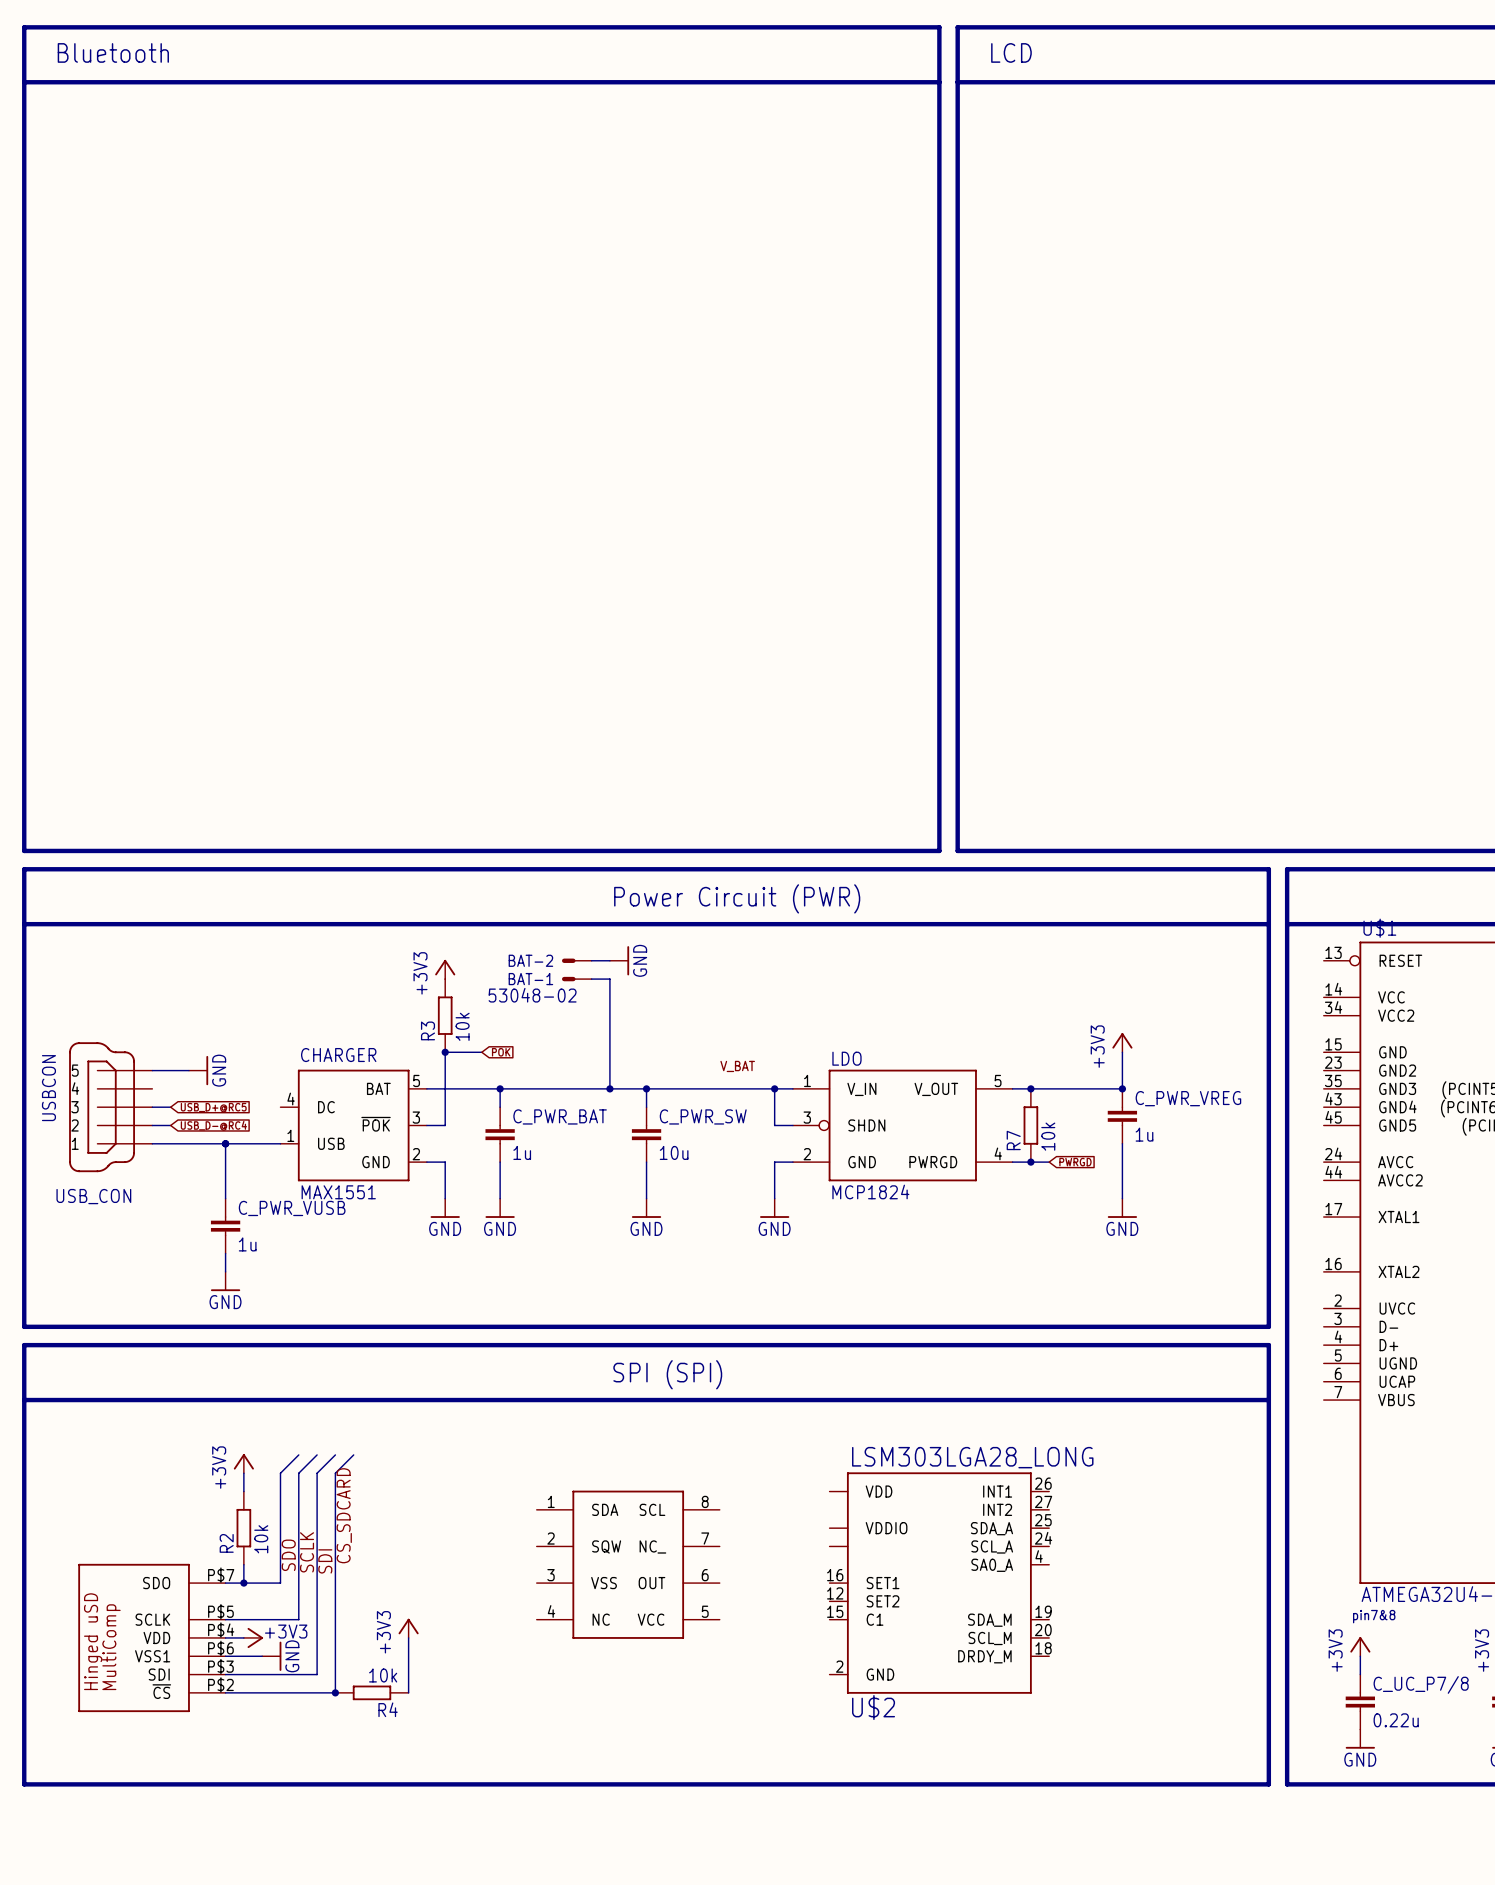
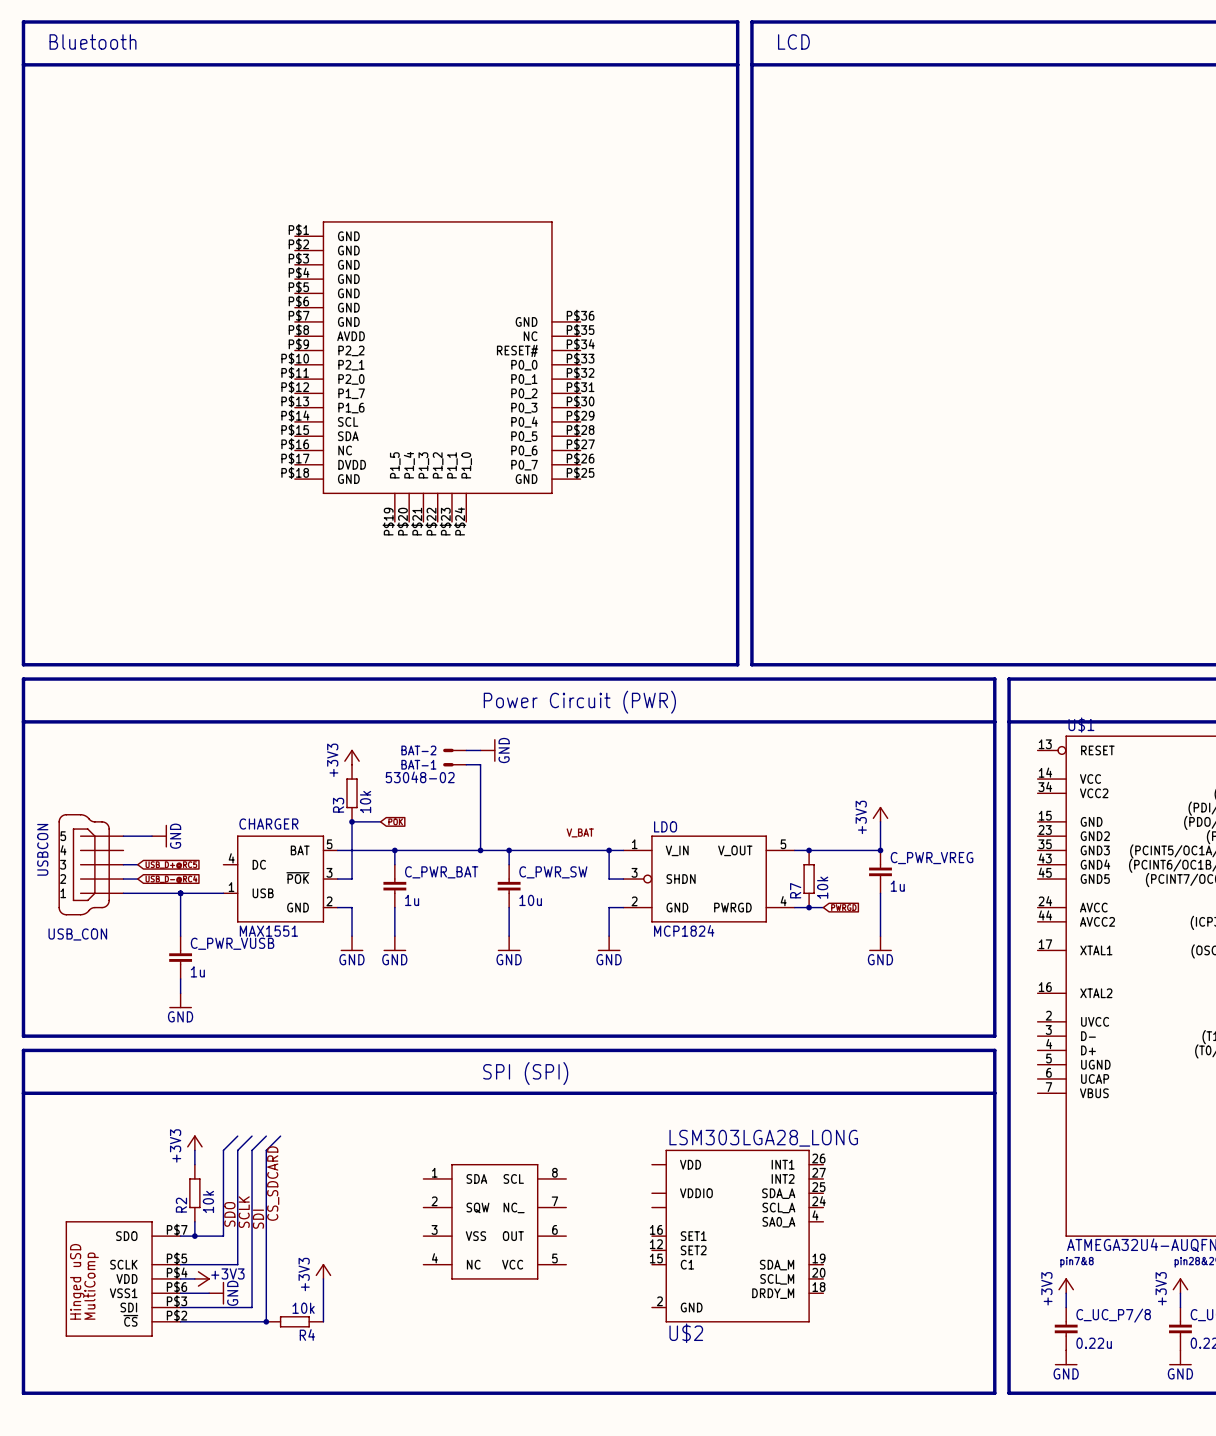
part: none -> (437, 371)

